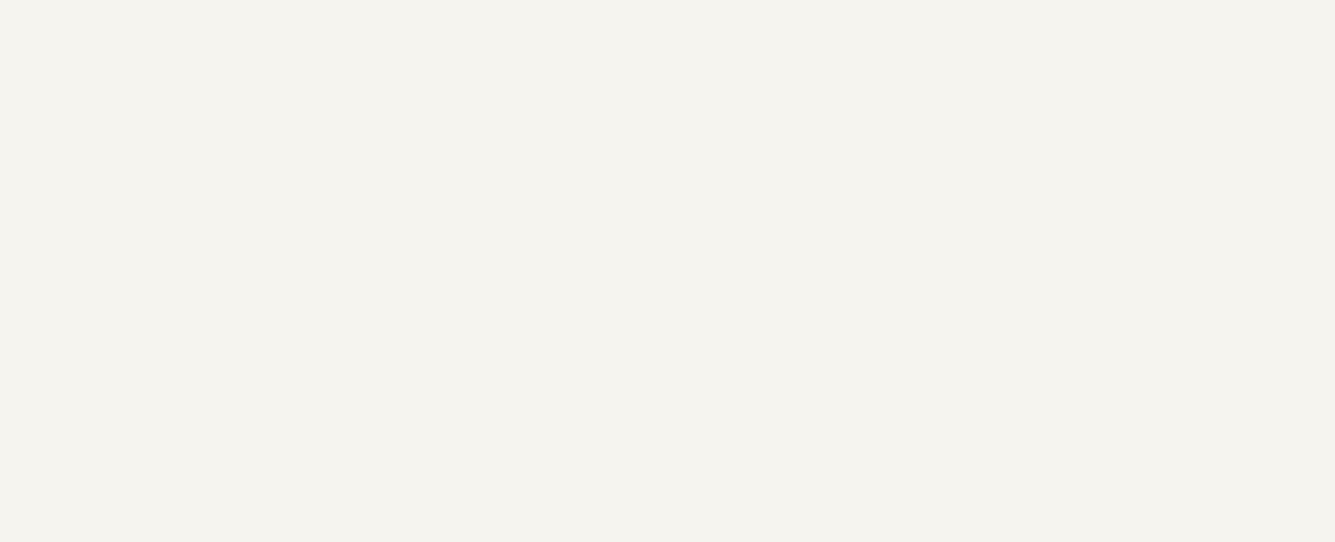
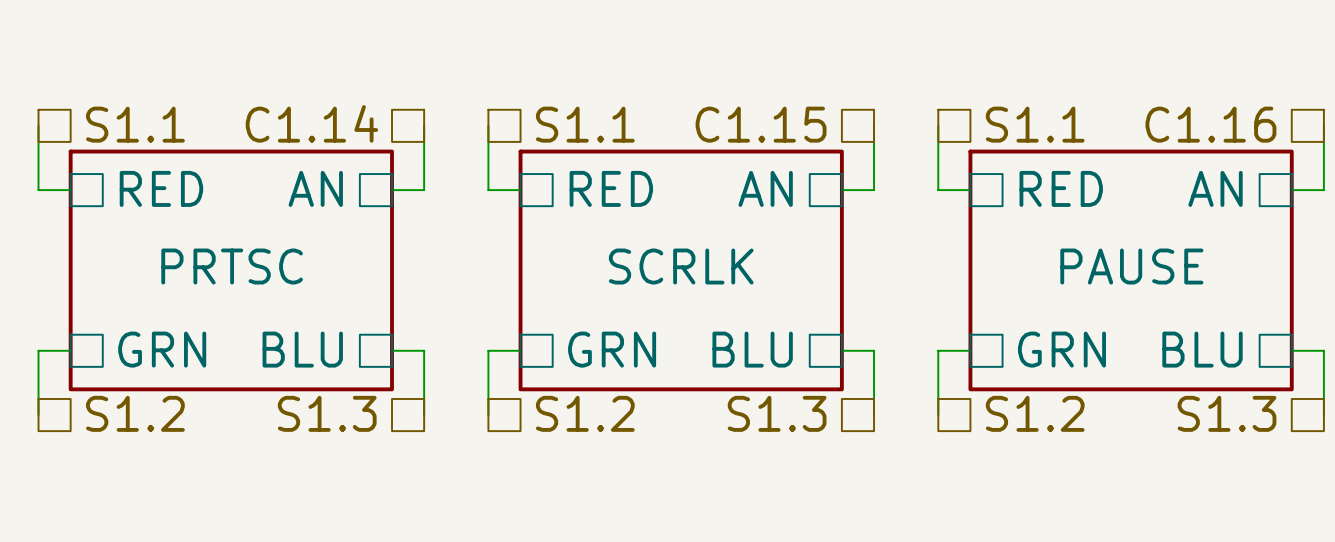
hierarchical label: none -> C1.14 (311, 123)
hierarchical label: none -> S1.1 (135, 124)
hierarchical label: none -> S1.1 (585, 124)
hierarchical label: none -> C1.15 (761, 124)
hierarchical label: none -> S1.1 (1035, 124)
hierarchical label: none -> C1.16 (1210, 124)
wire: none -> (38, 125) (38, 190) (70, 190)
wire: none -> (424, 125) (424, 190) (392, 190)
wire: none -> (488, 125) (488, 190) (520, 190)
wire: none -> (874, 125) (874, 190) (841, 190)
wire: none -> (938, 125) (938, 190) (970, 190)
wire: none -> (1323, 125) (1323, 190) (1291, 190)
sheet pin: none -> RED (161, 188)
sheet pin: none -> AN (315, 188)
sheet pin: none -> RED (611, 188)
sheet pin: none -> AN (765, 188)
sheet pin: none -> RED (1061, 188)
sheet pin: none -> AN (1215, 188)
sheet PRTSC: none -> (231, 270)
sheet SCRLK: none -> (681, 270)
sheet PAUSE: none -> (1131, 270)
sheet pin: none -> GRN (162, 349)
sheet pin: none -> BLU (302, 349)
sheet pin: none -> GRN (612, 349)
sheet pin: none -> BLU (752, 349)
sheet pin: none -> GRN (1061, 349)
sheet pin: none -> BLU (1202, 349)
wire: none -> (70, 350) (38, 350) (38, 415)
wire: none -> (392, 350) (424, 350) (424, 415)
wire: none -> (520, 350) (488, 350) (488, 415)
wire: none -> (841, 350) (874, 350) (874, 415)
wire: none -> (970, 350) (938, 350) (938, 415)
wire: none -> (1291, 350) (1323, 350) (1323, 415)
hierarchical label: none -> S1.2 (135, 413)
hierarchical label: none -> S1.3 (327, 413)
hierarchical label: none -> S1.2 (585, 413)
hierarchical label: none -> S1.3 (777, 413)
hierarchical label: none -> S1.2 (1035, 413)
hierarchical label: none -> S1.3 (1227, 413)

